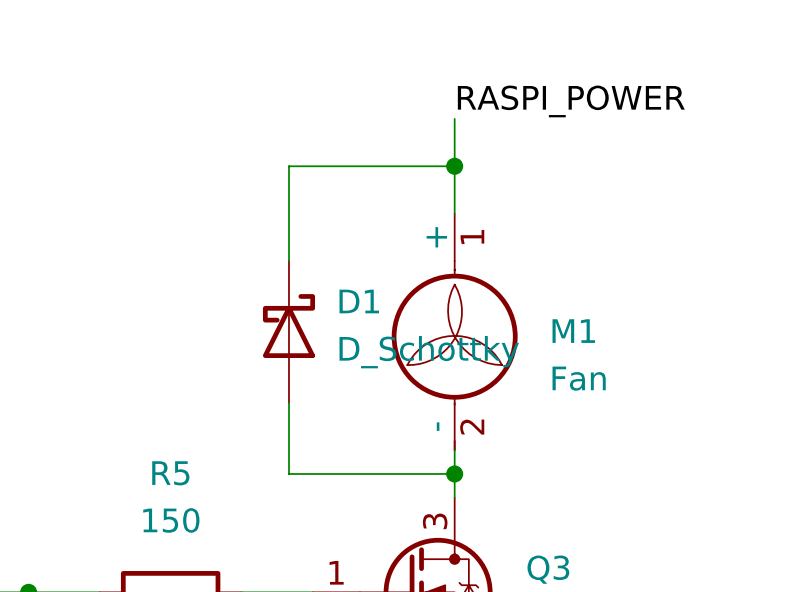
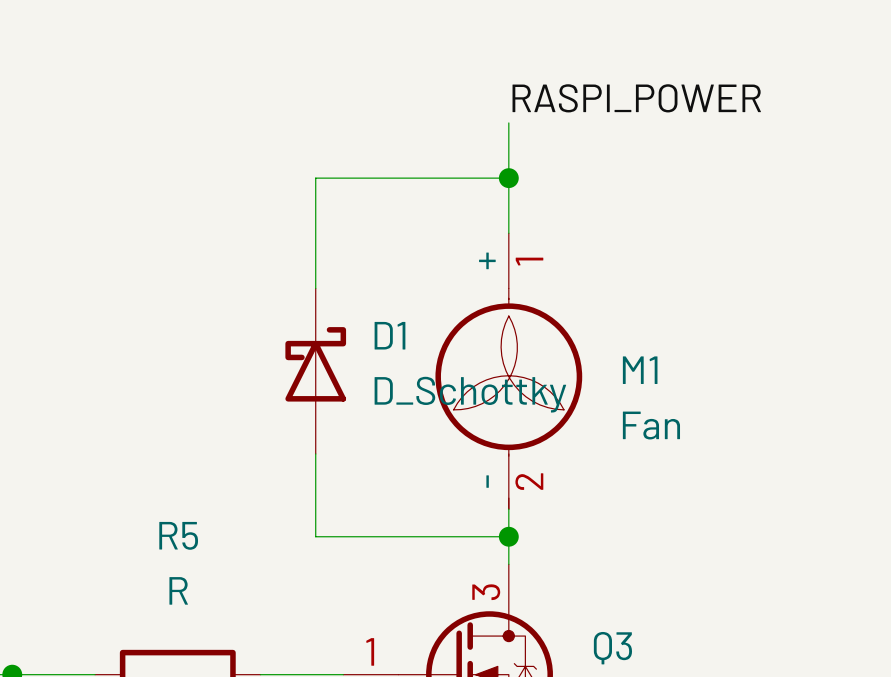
R5 value: 150 (171, 520) -> R (178, 590)

